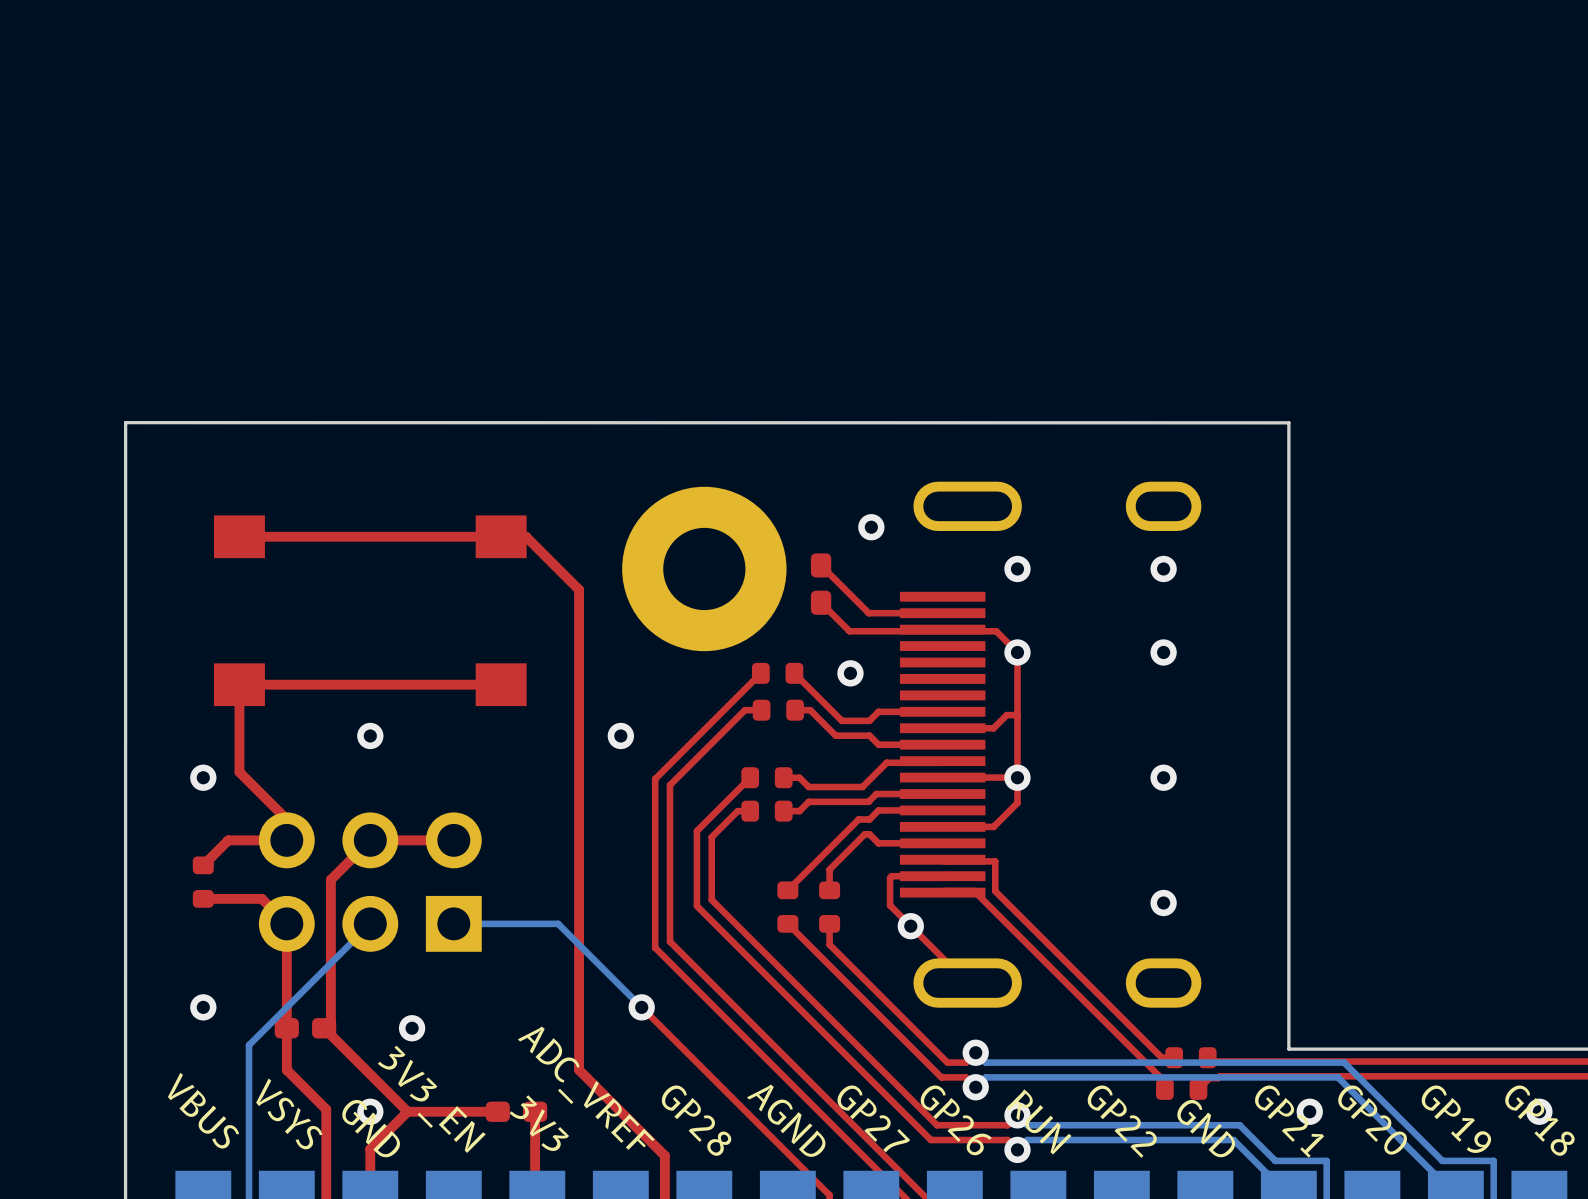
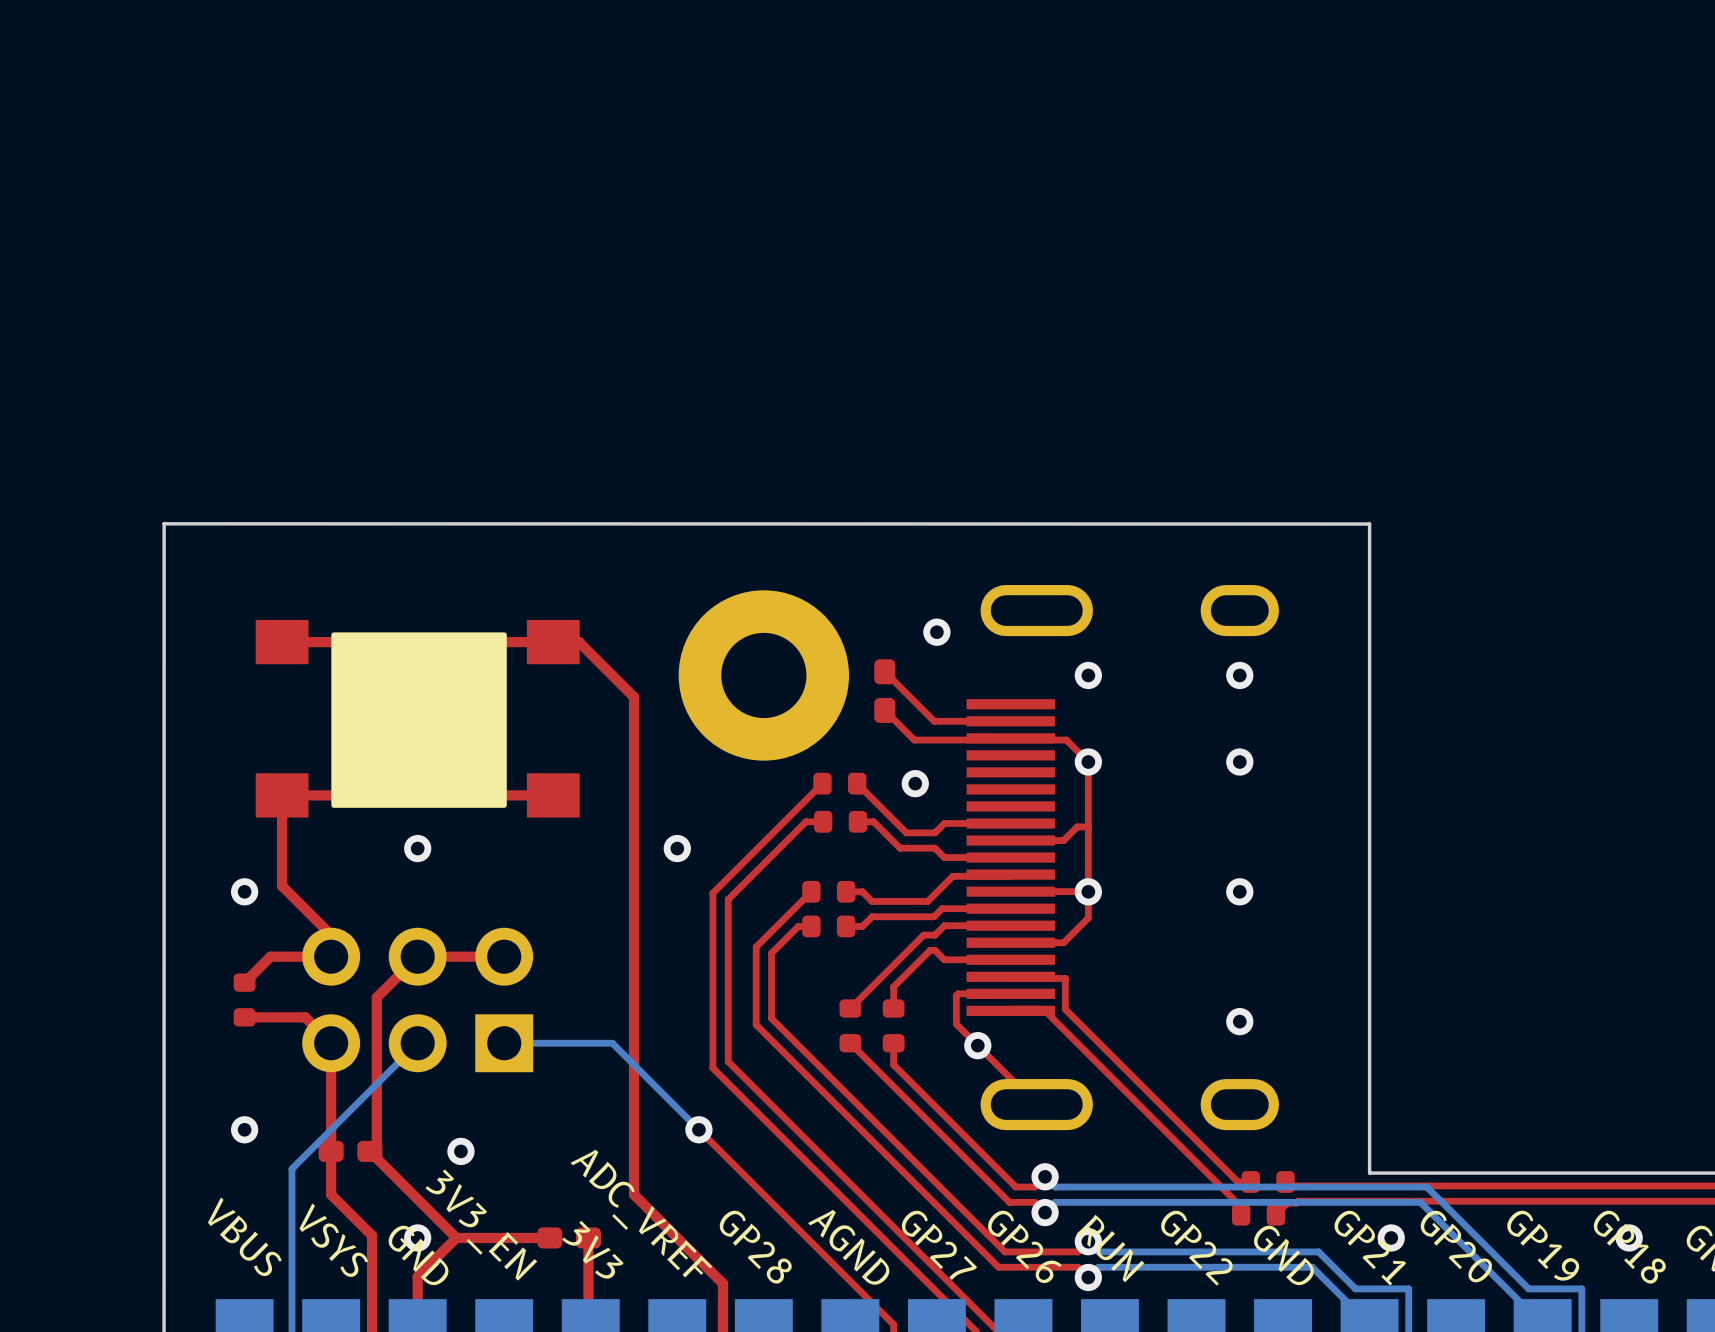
drawing: none -> [331, 632, 507, 808]

